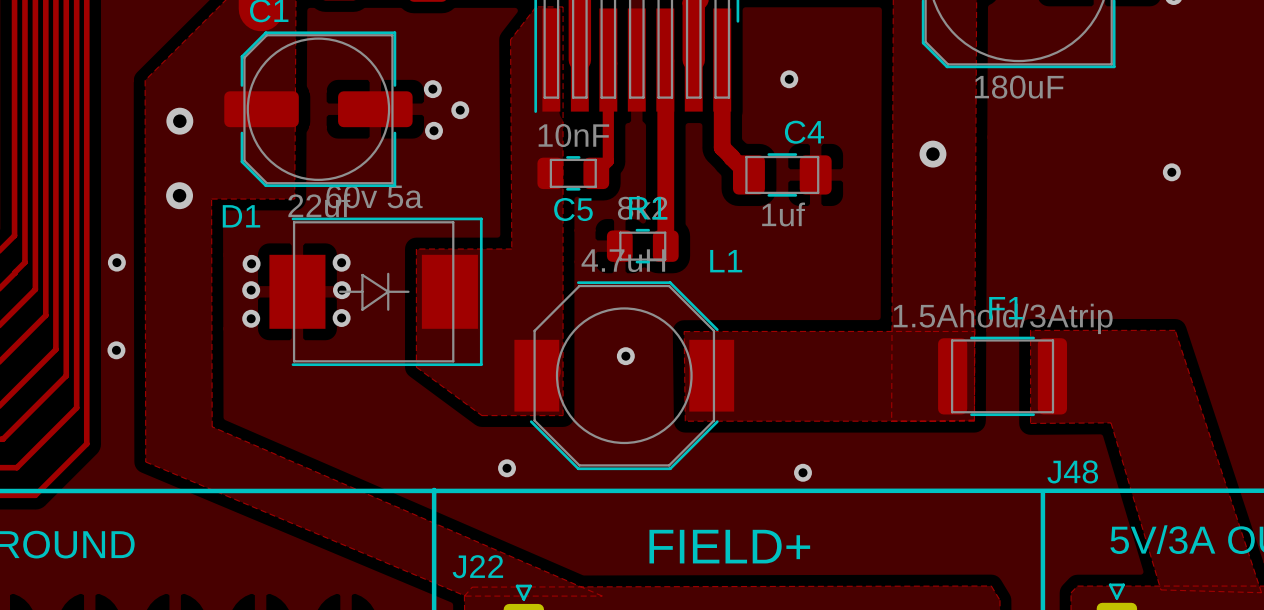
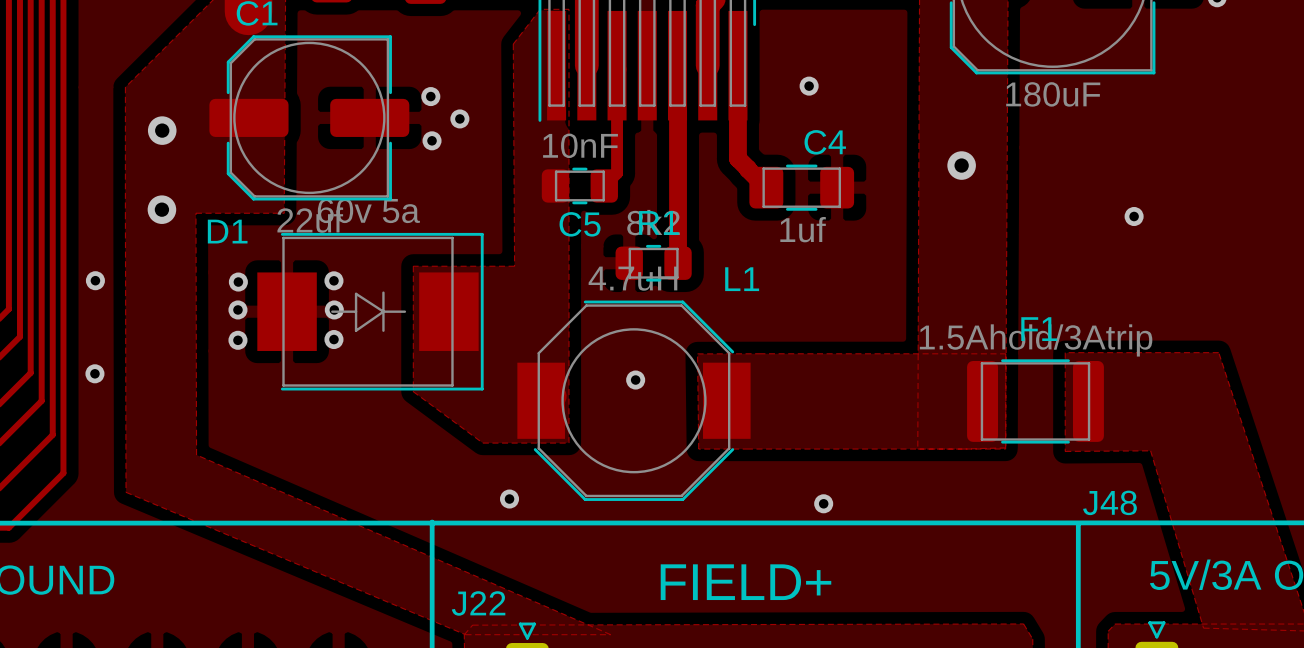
via position: (1171, 172) -> (1134, 216)

